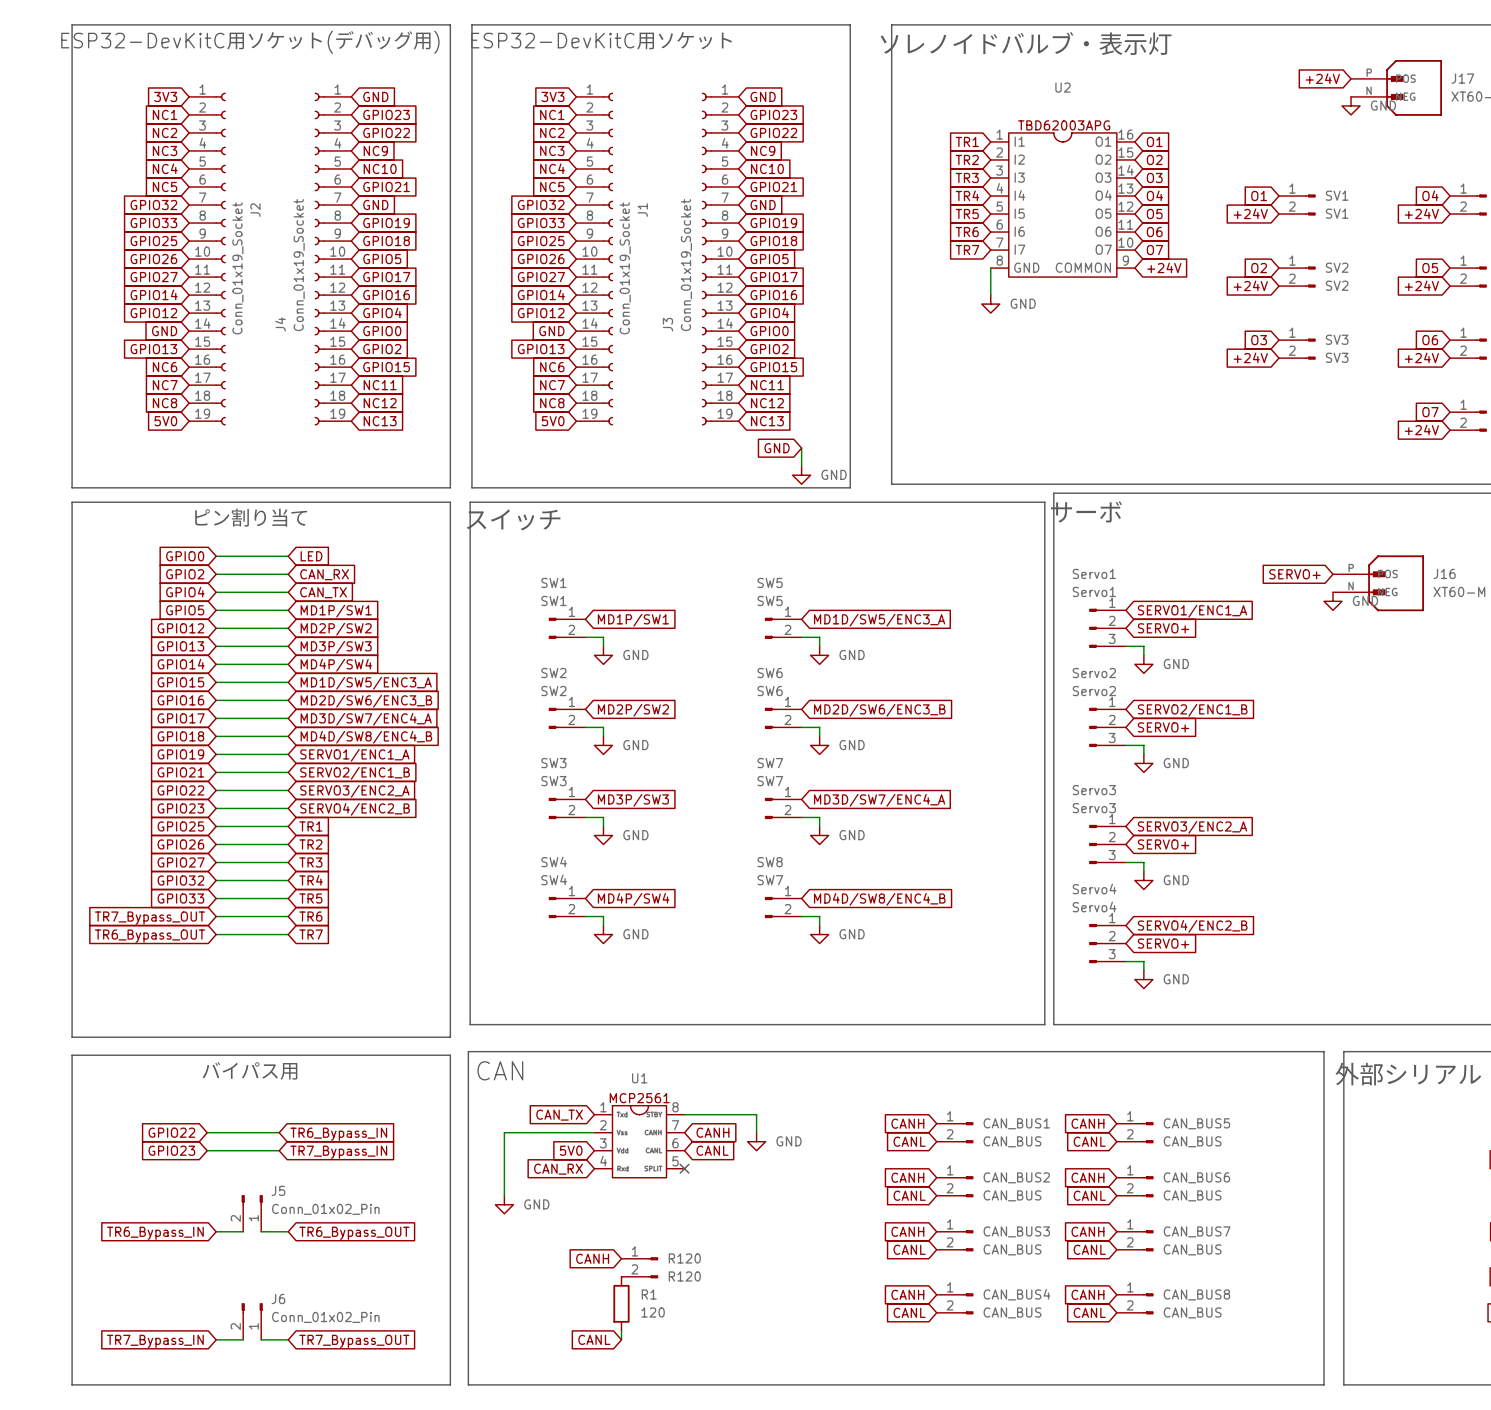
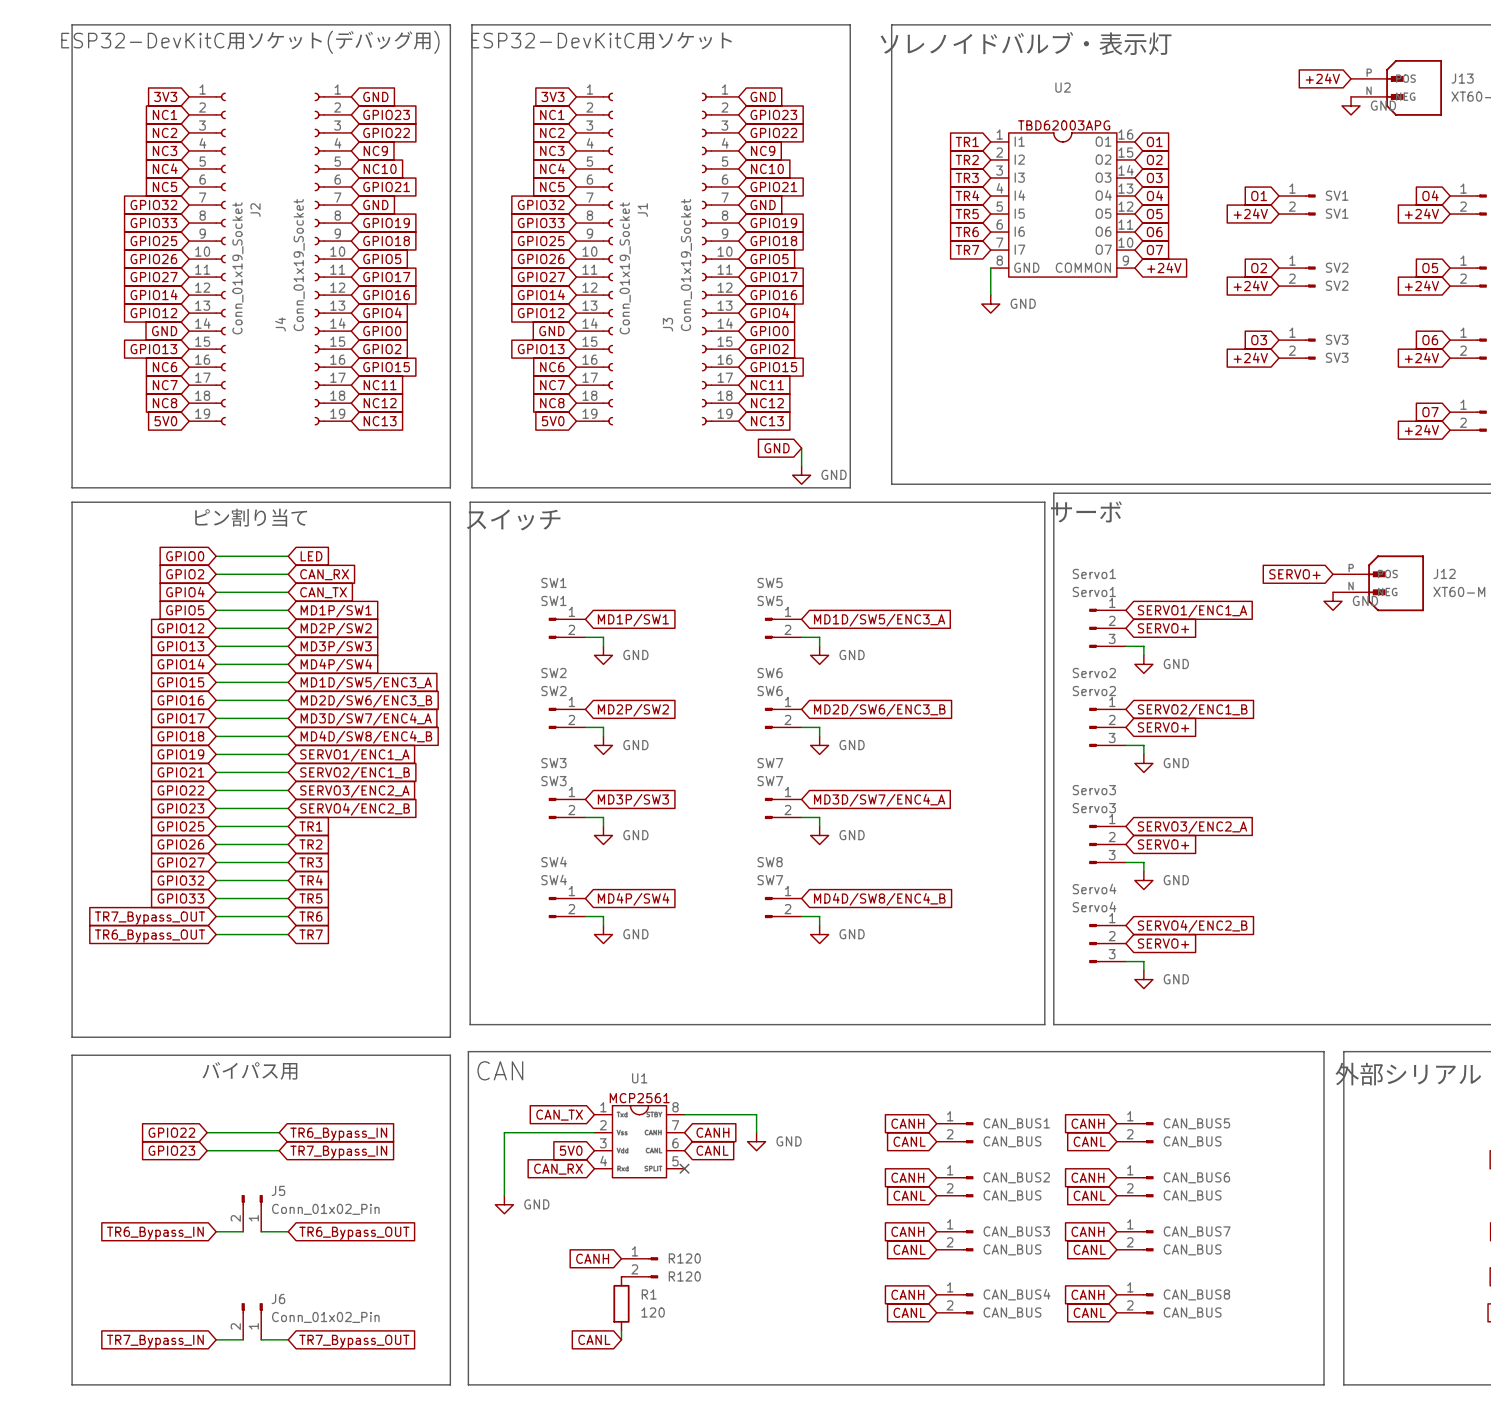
J17 name: J17 (1462, 78) -> J13 (1462, 78)
J16 name: J16 (1444, 573) -> J12 (1444, 573)

